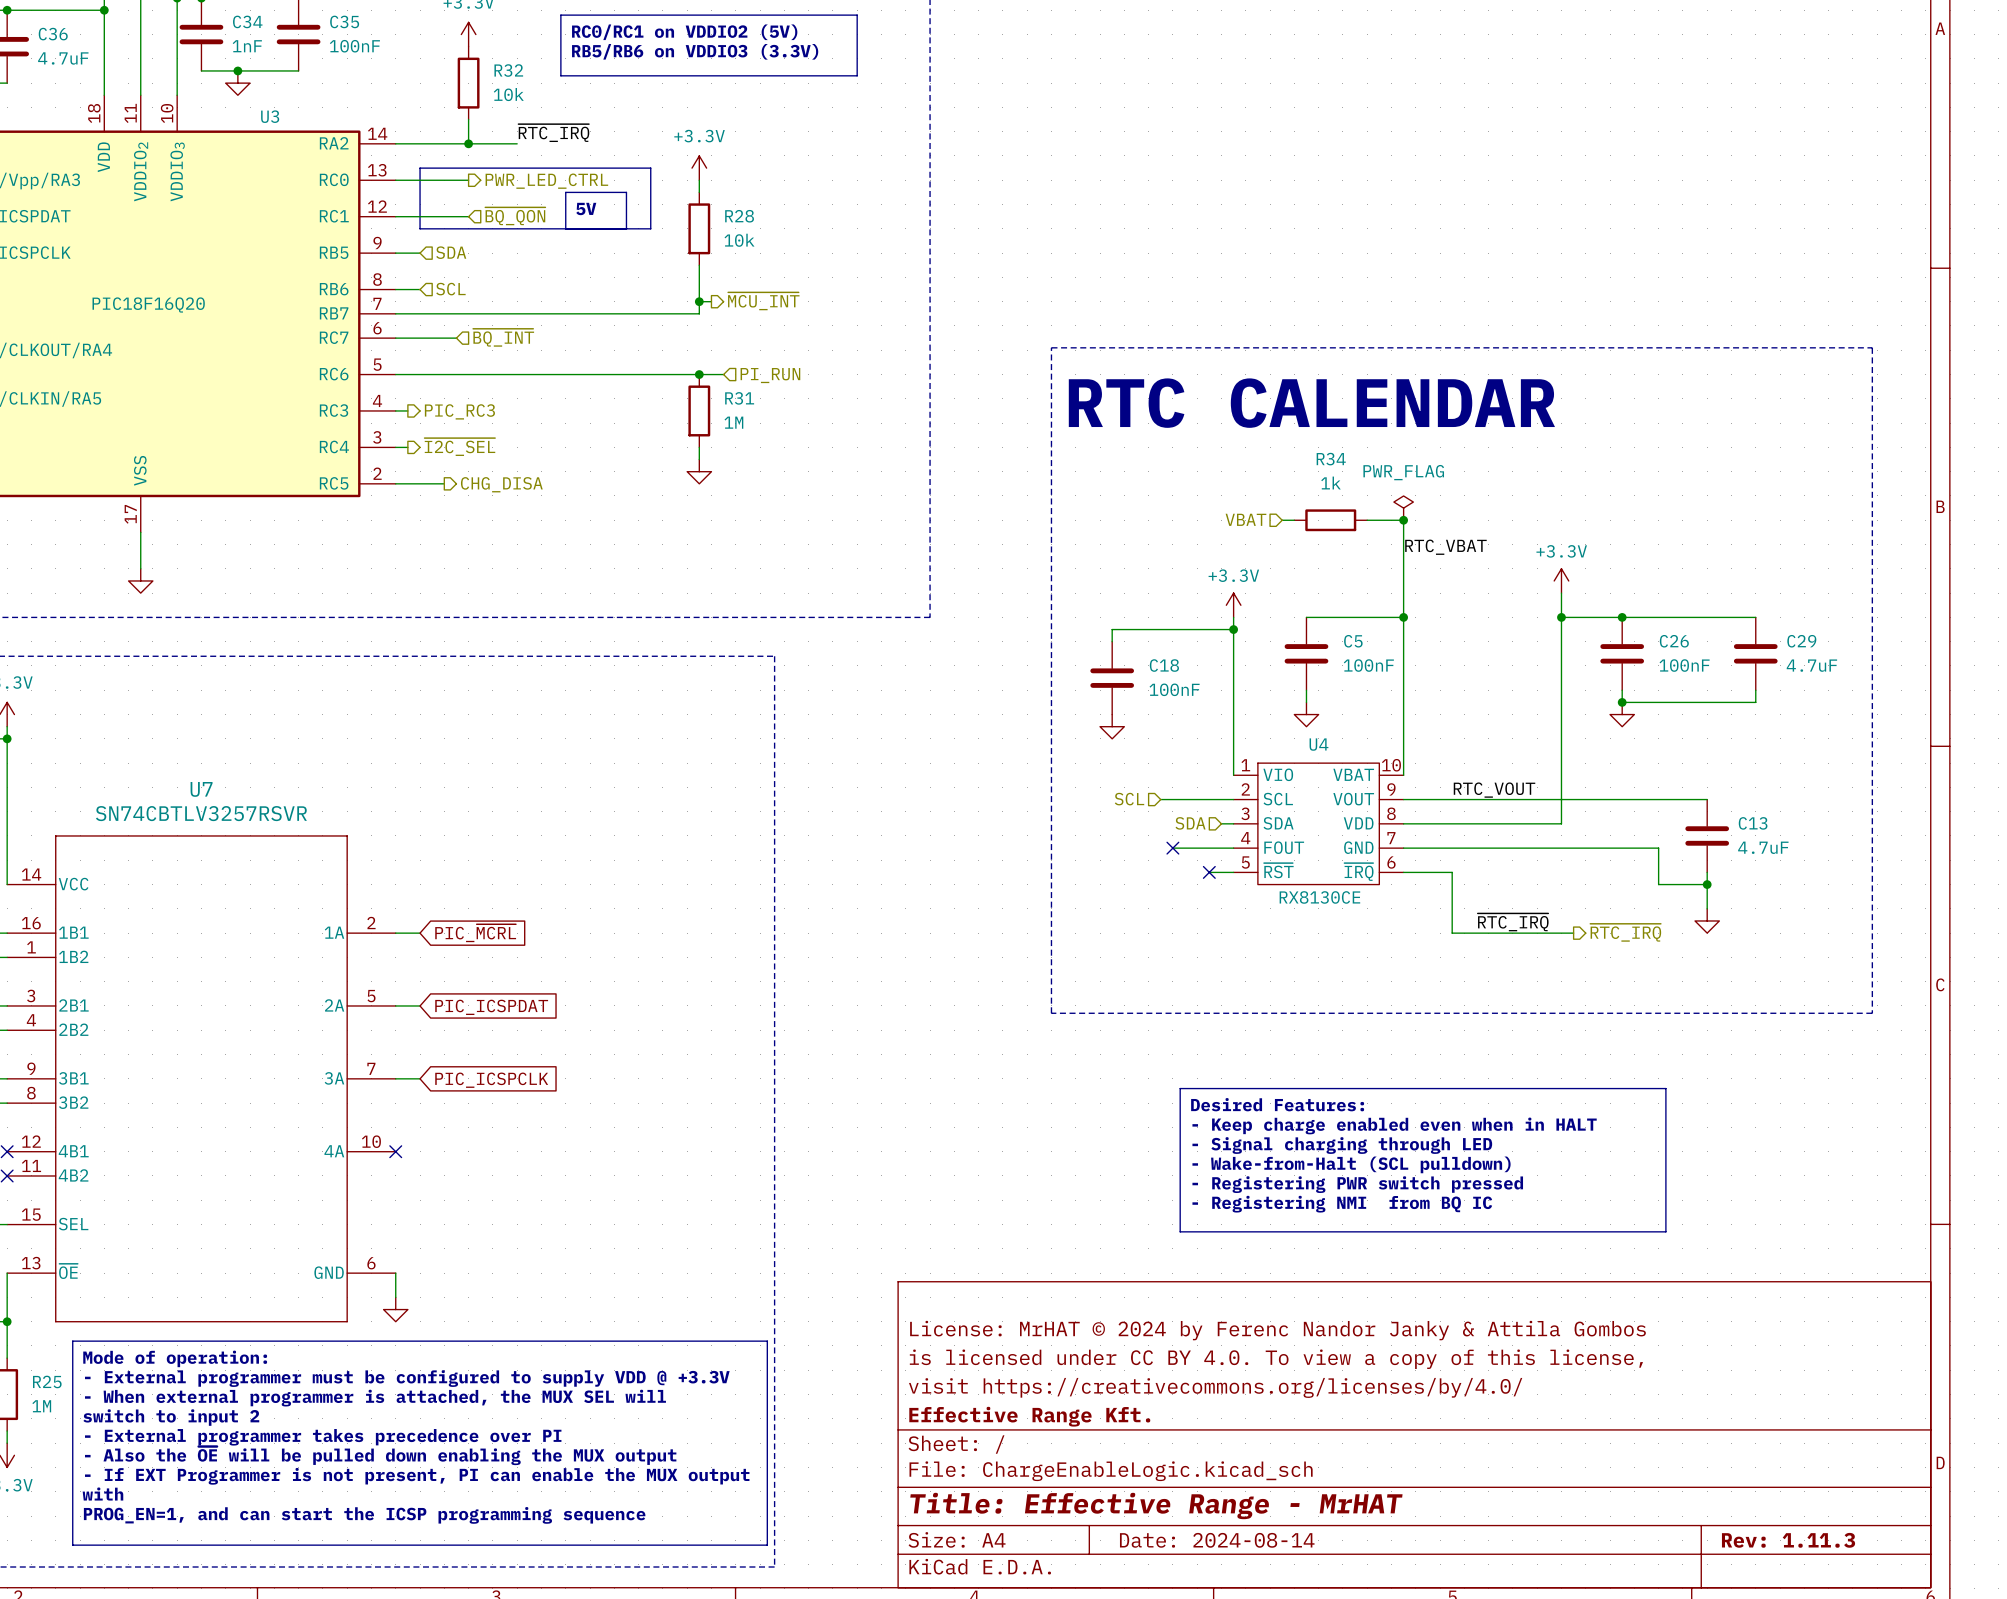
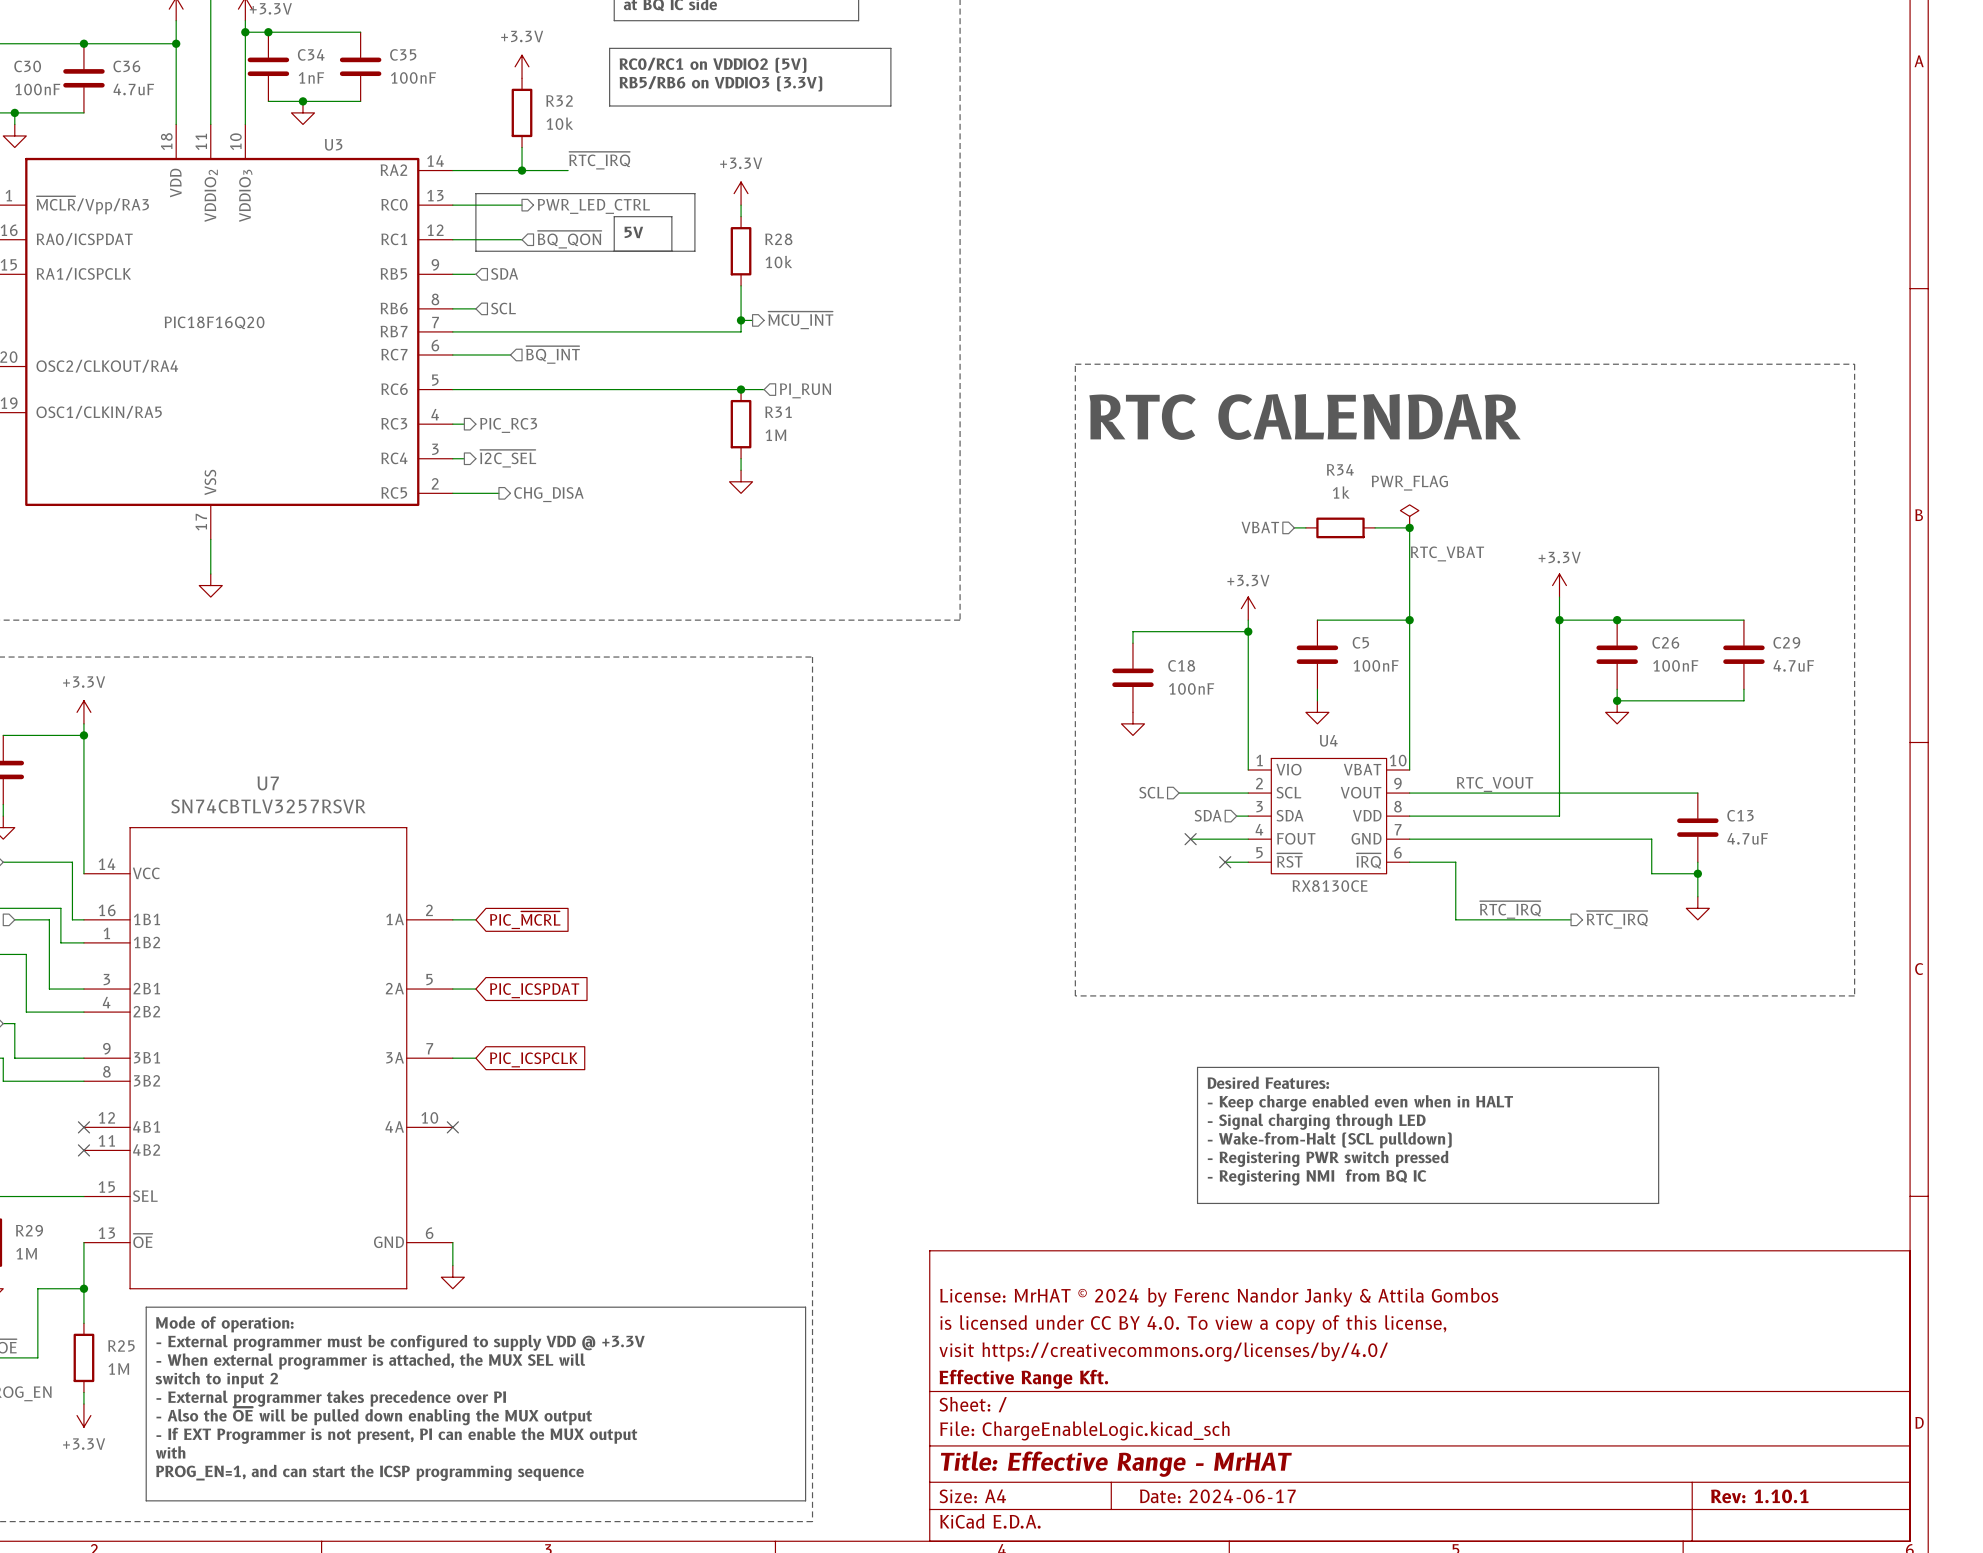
title block: Date: 2024-08-14 (1217, 1540) -> Date: 2024-06-17 (1217, 1496)
title block: Rev: 1.11.3 (1788, 1540) -> Rev: 1.10.1 (1759, 1496)

